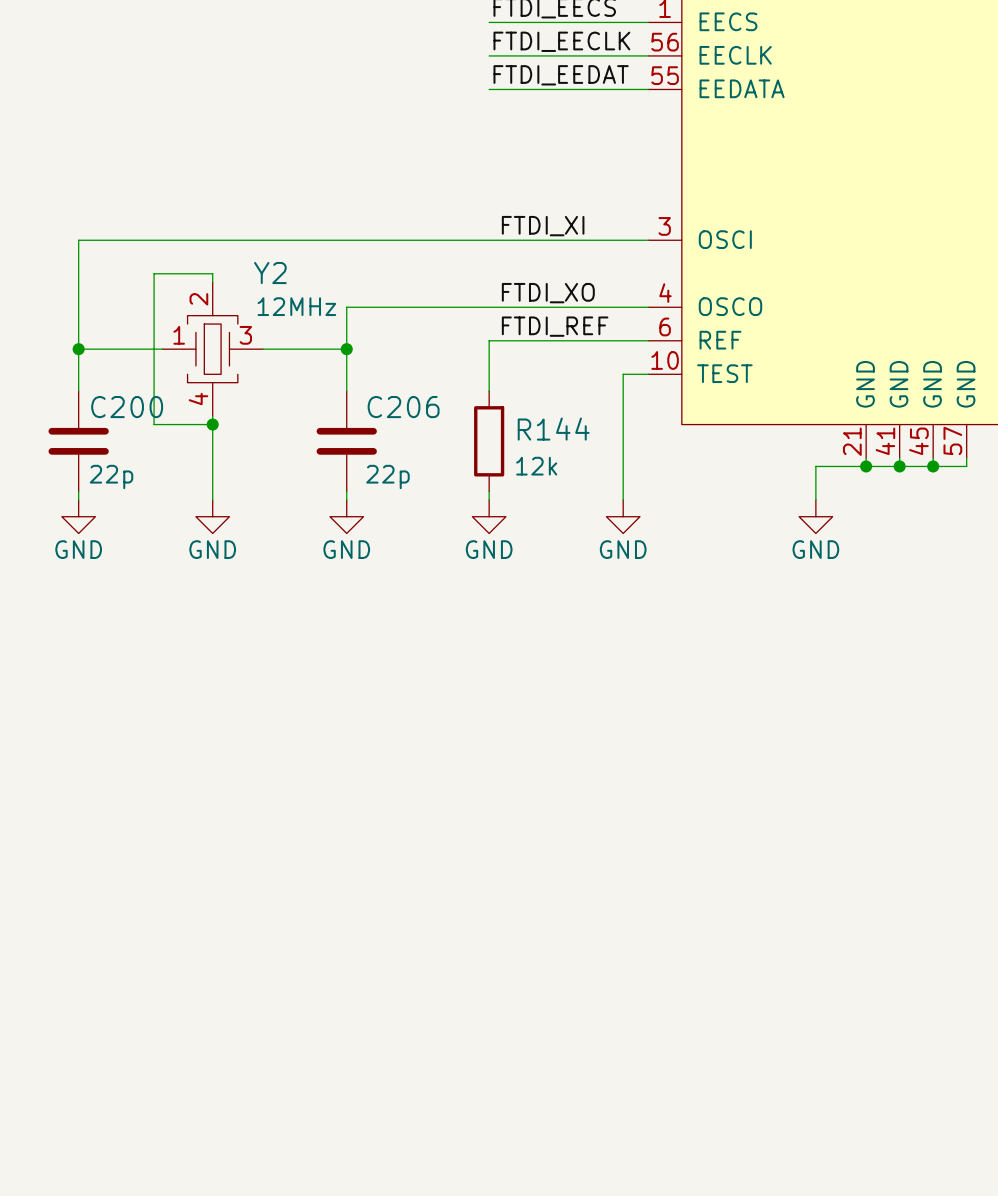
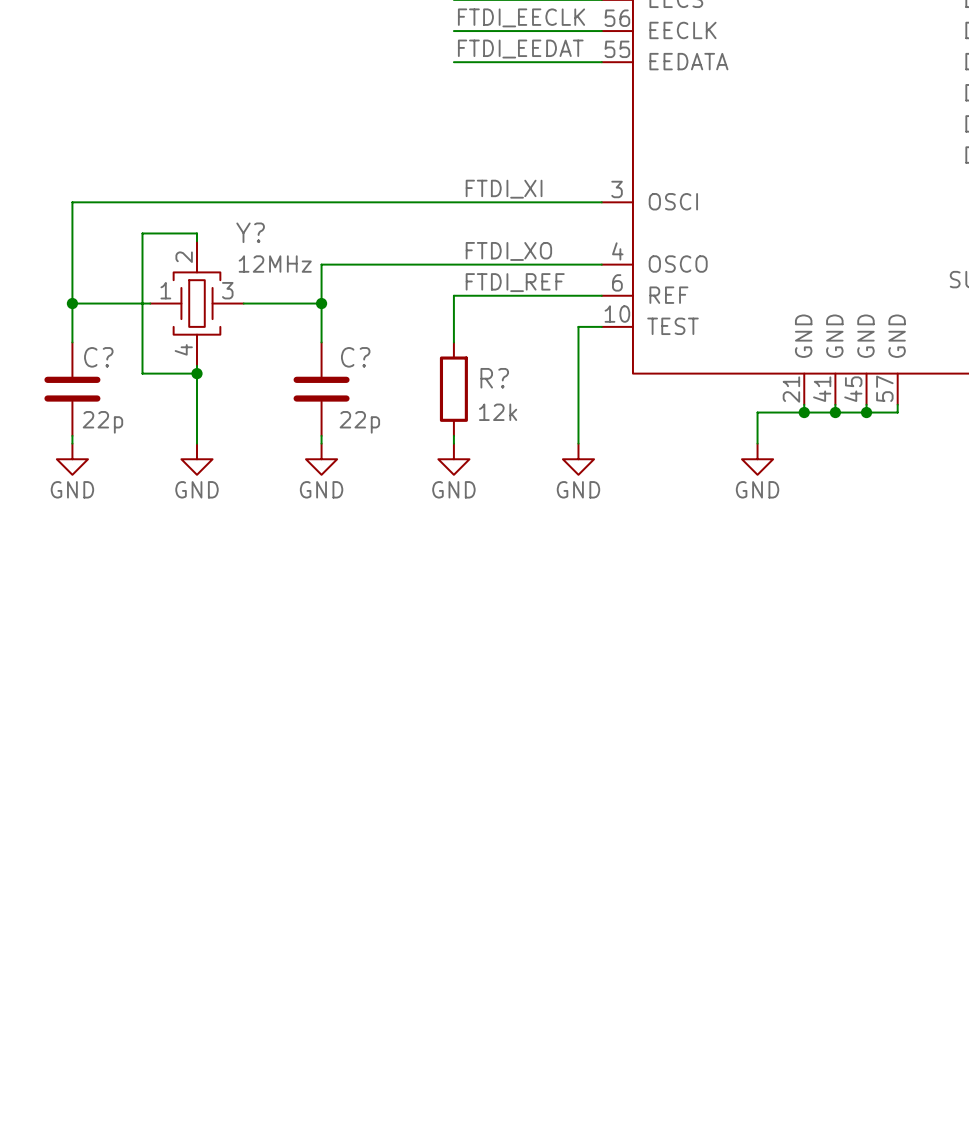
Y2 name: Y2 (270, 273) -> Y? (250, 232)
C200 name: C200 (127, 407) -> C? (98, 357)
C206 name: C206 (403, 407) -> C? (355, 357)
R144 name: R144 (553, 429) -> R? (494, 378)

